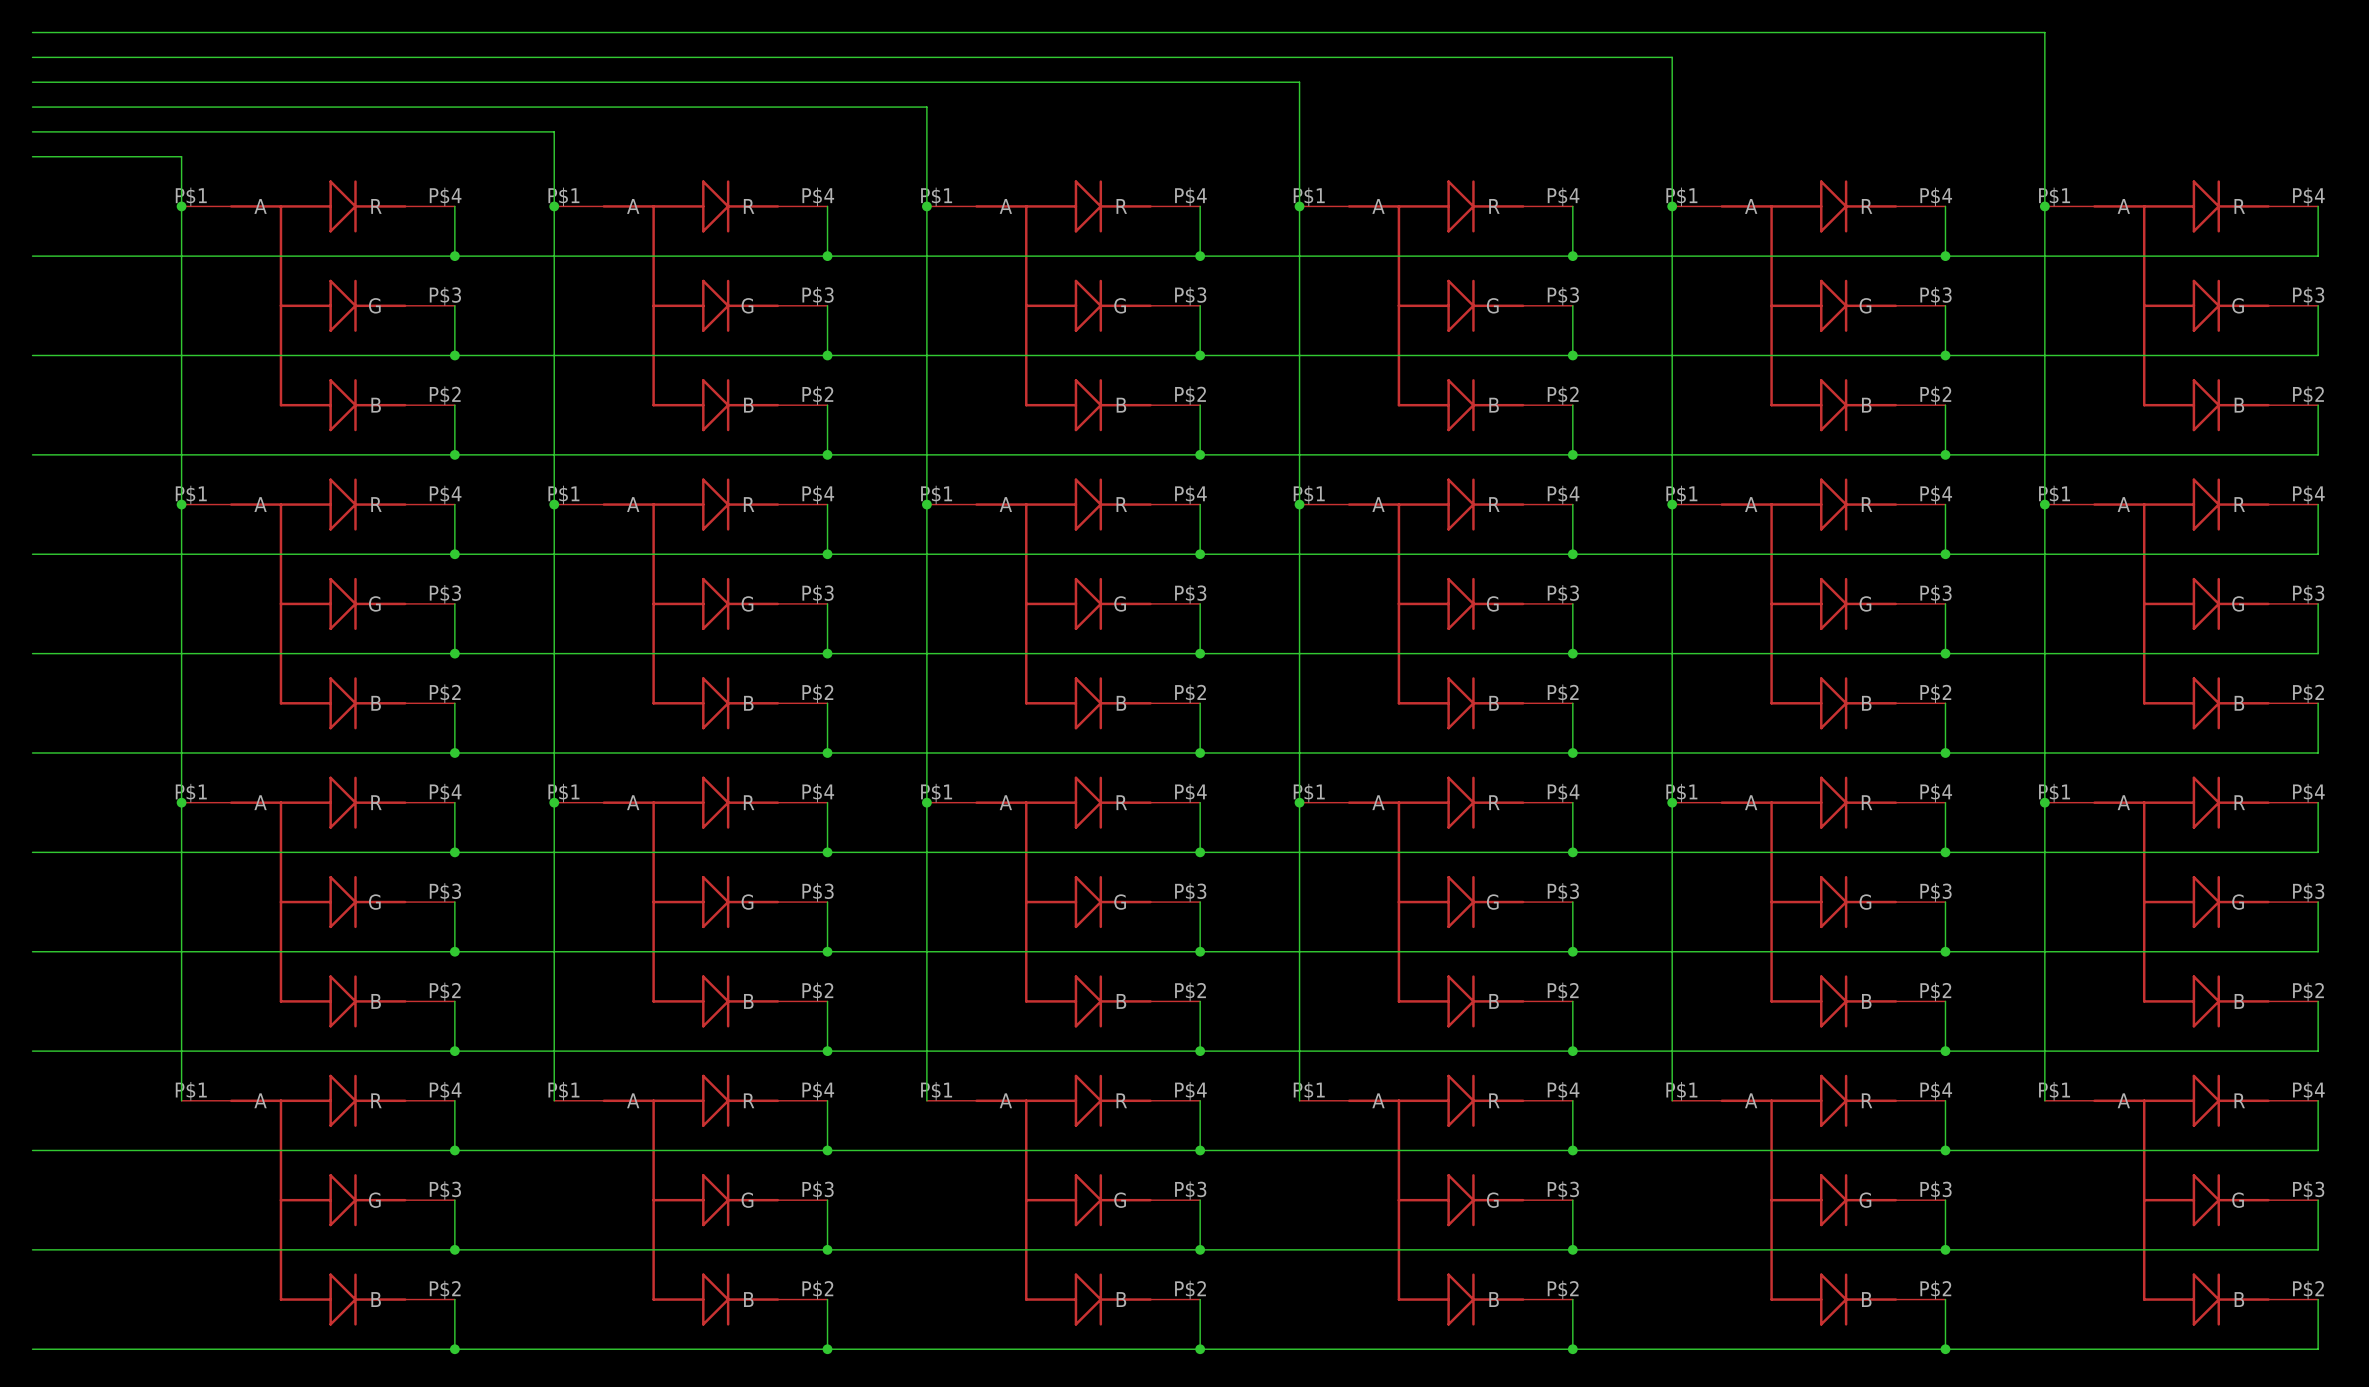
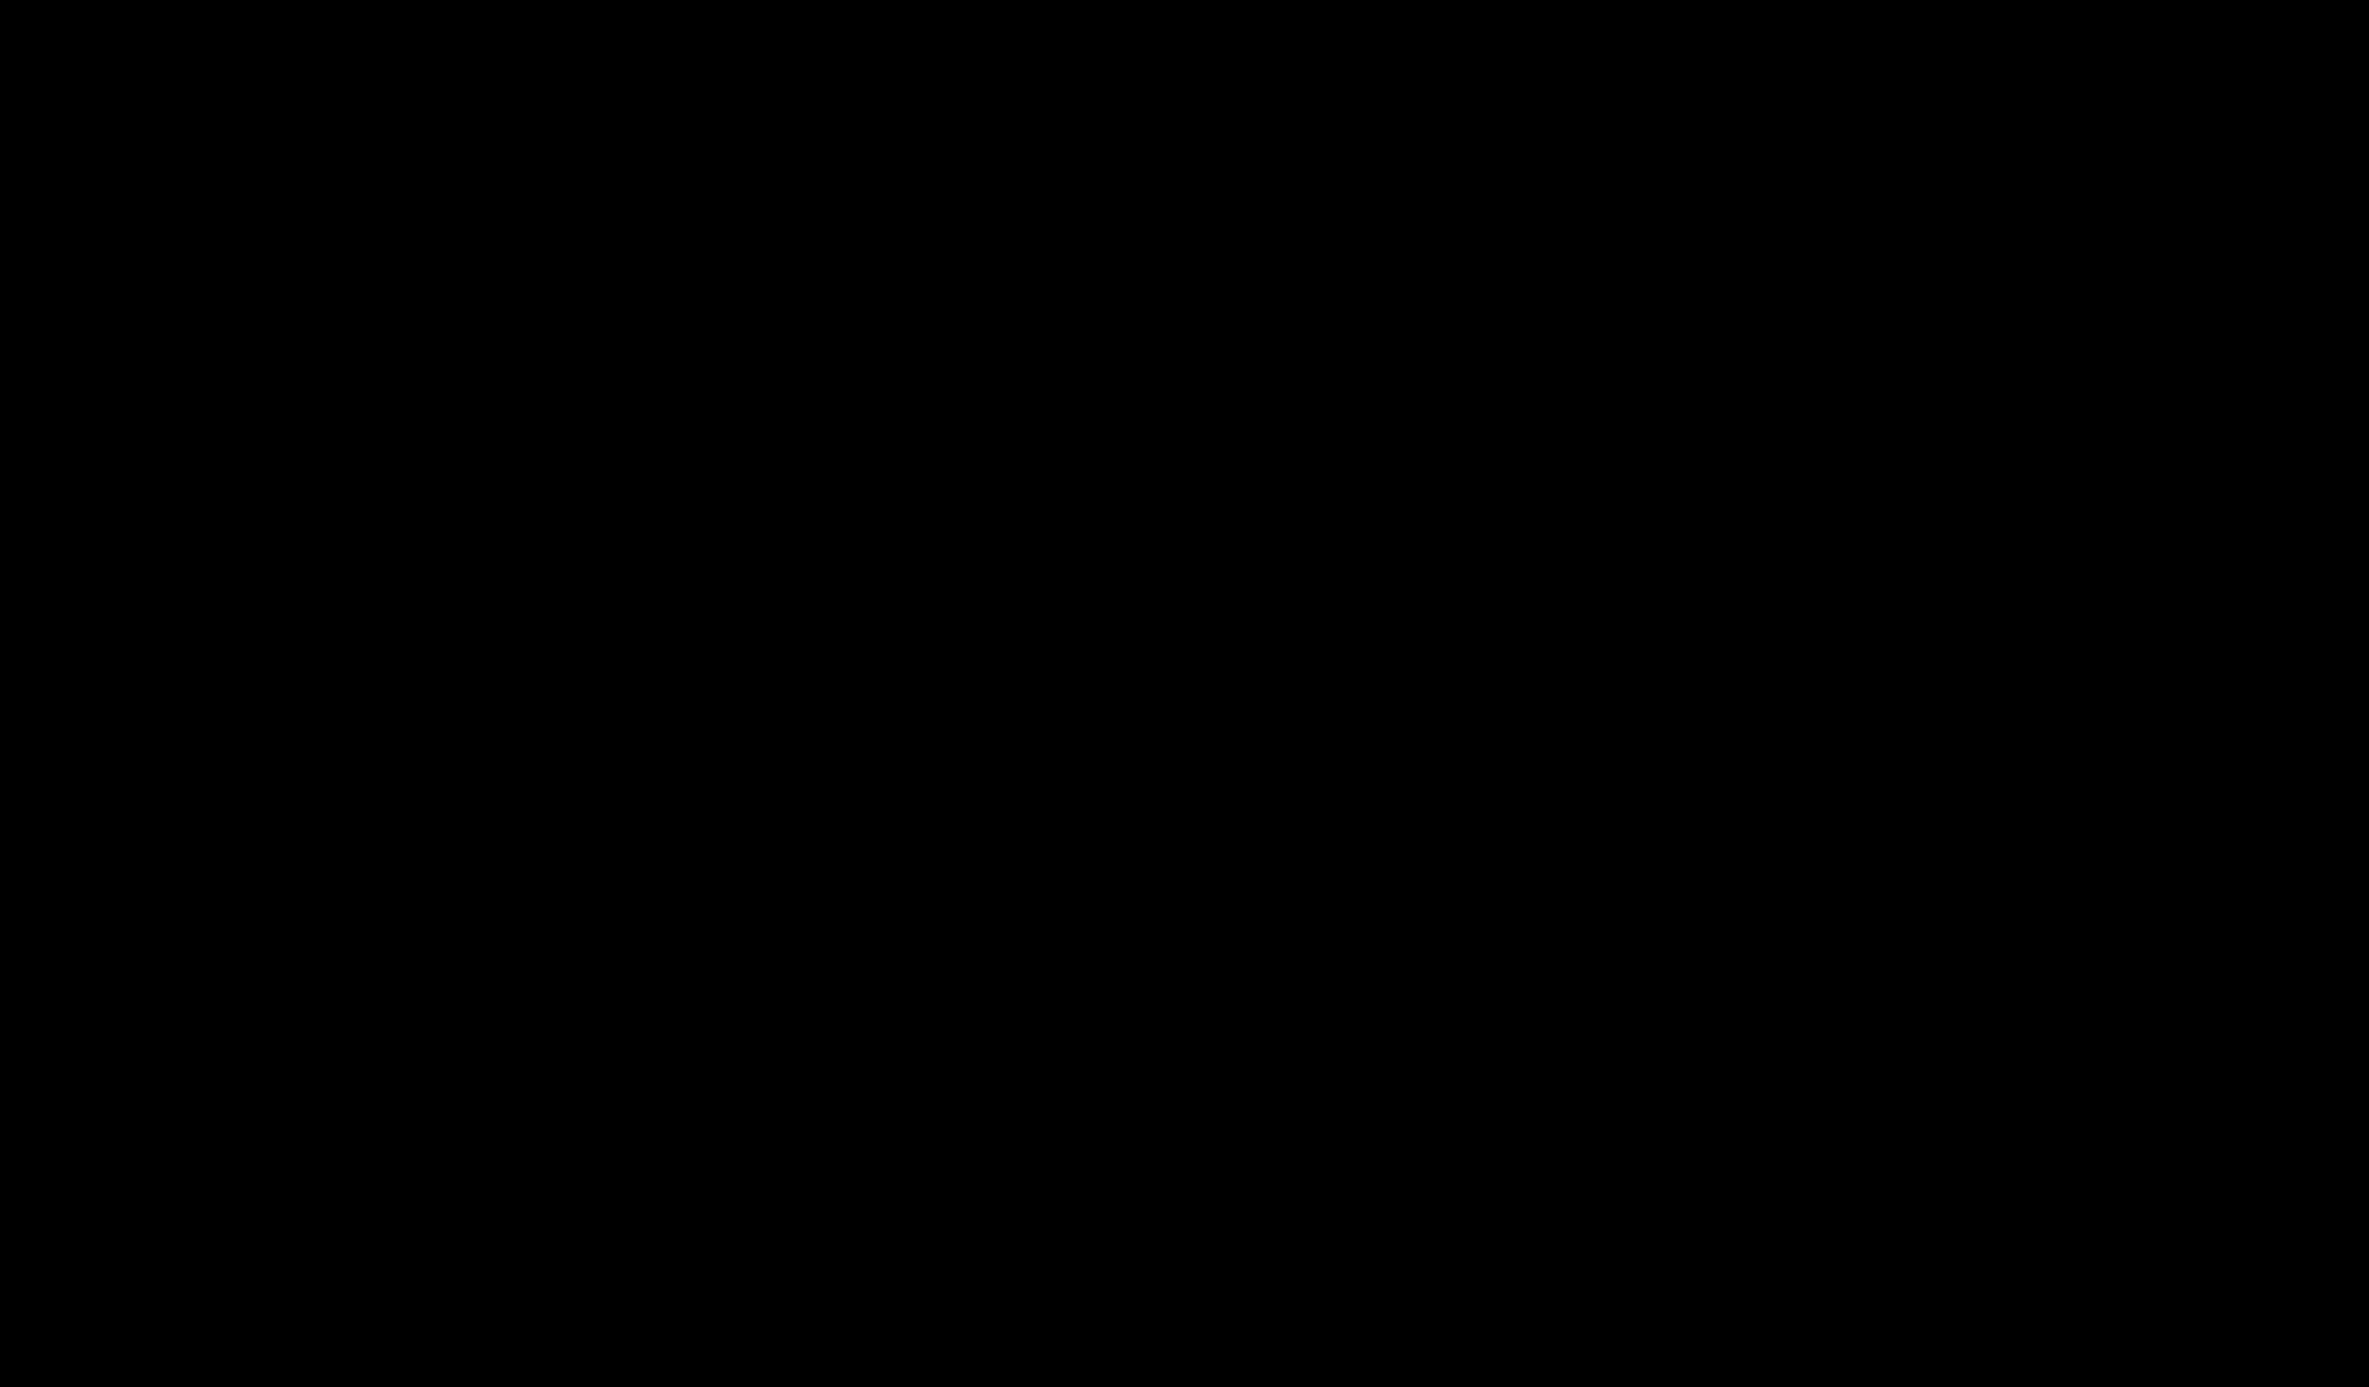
wire: (32, 32) (2044, 32) (2044, 1100) -> none
wire: (32, 57) (1672, 57) (1672, 1100) -> none
wire: (32, 82) (1299, 82) (1299, 1100) -> none
wire: (32, 107) (926, 107) (926, 1100) -> none
wire: (32, 131) (554, 131) (554, 1100) -> none
wire: (32, 156) (181, 156) (181, 1100) -> none
junction: (181, 206) -> none
wire: (454, 206) (454, 256) -> none
junction: (554, 206) -> none
wire: (827, 206) (827, 256) -> none
junction: (926, 206) -> none
wire: (1200, 206) (1200, 256) -> none
junction: (1299, 206) -> none
wire: (1572, 206) (1572, 256) -> none
junction: (1672, 206) -> none
wire: (1945, 206) (1945, 256) -> none
junction: (2044, 206) -> none
wire: (2318, 206) (2318, 256) (32, 256) -> none
junction: (454, 256) -> none
junction: (827, 256) -> none
junction: (1200, 256) -> none
junction: (1572, 256) -> none
junction: (1945, 256) -> none
part: (318, 305) -> none
wire: (454, 305) (454, 355) -> none
part: (690, 305) -> none
wire: (827, 305) (827, 355) -> none
part: (1063, 305) -> none
wire: (1200, 305) (1200, 355) -> none
part: (1436, 305) -> none
wire: (1572, 305) (1572, 355) -> none
part: (1808, 305) -> none
wire: (1945, 305) (1945, 355) -> none
part: (2181, 305) -> none
wire: (2318, 305) (2318, 355) (32, 355) -> none
junction: (454, 355) -> none
junction: (827, 355) -> none
junction: (1200, 355) -> none
junction: (1572, 355) -> none
junction: (1945, 355) -> none
wire: (454, 405) (454, 454) -> none
wire: (827, 405) (827, 454) -> none
wire: (1200, 405) (1200, 454) -> none
wire: (1572, 405) (1572, 454) -> none
wire: (1945, 405) (1945, 454) -> none
wire: (2318, 405) (2318, 454) (32, 454) -> none
junction: (454, 454) -> none
junction: (827, 454) -> none
junction: (1200, 454) -> none
junction: (1572, 454) -> none
junction: (1945, 454) -> none
junction: (181, 504) -> none
wire: (454, 504) (454, 554) -> none
junction: (554, 504) -> none
wire: (827, 504) (827, 554) -> none
junction: (926, 504) -> none
wire: (1200, 504) (1200, 554) -> none
junction: (1299, 504) -> none
wire: (1572, 504) (1572, 554) -> none
junction: (1672, 504) -> none
wire: (1945, 504) (1945, 554) -> none
junction: (2044, 504) -> none
wire: (2318, 504) (2318, 554) (32, 554) -> none
junction: (454, 554) -> none
junction: (827, 554) -> none
junction: (1200, 554) -> none
junction: (1572, 554) -> none
junction: (1945, 554) -> none
part: (318, 603) -> none
wire: (454, 603) (454, 653) -> none
part: (690, 603) -> none
wire: (827, 603) (827, 653) -> none
part: (1063, 603) -> none
wire: (1200, 603) (1200, 653) -> none
part: (1436, 603) -> none
wire: (1572, 603) (1572, 653) -> none
part: (1808, 603) -> none
wire: (1945, 603) (1945, 653) -> none
part: (2181, 603) -> none
wire: (2318, 603) (2318, 653) (32, 653) -> none
junction: (454, 653) -> none
junction: (827, 653) -> none
junction: (1200, 653) -> none
junction: (1572, 653) -> none
junction: (1945, 653) -> none
wire: (454, 703) (454, 752) -> none
wire: (827, 703) (827, 752) -> none
wire: (1200, 703) (1200, 752) -> none
wire: (1572, 703) (1572, 752) -> none
wire: (1945, 703) (1945, 752) -> none
wire: (2318, 703) (2318, 752) (32, 752) -> none
junction: (454, 752) -> none
junction: (827, 752) -> none
junction: (1200, 752) -> none
junction: (1572, 752) -> none
junction: (1945, 752) -> none
junction: (181, 802) -> none
wire: (454, 802) (454, 852) -> none
junction: (554, 802) -> none
wire: (827, 802) (827, 852) -> none
junction: (926, 802) -> none
wire: (1200, 802) (1200, 852) -> none
junction: (1299, 802) -> none
wire: (1572, 802) (1572, 852) -> none
junction: (1672, 802) -> none
wire: (1945, 802) (1945, 852) -> none
junction: (2044, 802) -> none
wire: (2318, 802) (2318, 852) (32, 852) -> none
junction: (454, 852) -> none
junction: (827, 852) -> none
junction: (1200, 852) -> none
junction: (1572, 852) -> none
junction: (1945, 852) -> none
part: (318, 902) -> none
wire: (454, 902) (454, 951) -> none
part: (690, 902) -> none
wire: (827, 902) (827, 951) -> none
part: (1063, 902) -> none
wire: (1200, 902) (1200, 951) -> none
part: (1436, 902) -> none
wire: (1572, 902) (1572, 951) -> none
part: (1808, 902) -> none
wire: (1945, 902) (1945, 951) -> none
part: (2181, 902) -> none
wire: (2318, 902) (2318, 951) (32, 951) -> none
junction: (454, 951) -> none
junction: (827, 951) -> none
junction: (1200, 951) -> none
junction: (1572, 951) -> none
junction: (1945, 951) -> none
wire: (454, 1001) (454, 1051) -> none
wire: (827, 1001) (827, 1051) -> none
wire: (1200, 1001) (1200, 1051) -> none
wire: (1572, 1001) (1572, 1051) -> none
wire: (1945, 1001) (1945, 1051) -> none
wire: (2318, 1001) (2318, 1051) (32, 1051) -> none
junction: (454, 1051) -> none
junction: (827, 1051) -> none
junction: (1200, 1051) -> none
junction: (1572, 1051) -> none
junction: (1945, 1051) -> none
wire: (454, 1100) (454, 1150) -> none
wire: (827, 1100) (827, 1150) -> none
wire: (1200, 1100) (1200, 1150) -> none
wire: (1572, 1100) (1572, 1150) -> none
wire: (1945, 1100) (1945, 1150) -> none
wire: (2318, 1100) (2318, 1150) (32, 1150) -> none
junction: (454, 1150) -> none
junction: (827, 1150) -> none
junction: (1200, 1150) -> none
junction: (1572, 1150) -> none
junction: (1945, 1150) -> none
part: (318, 1200) -> none
wire: (454, 1200) (454, 1249) -> none
part: (690, 1200) -> none
wire: (827, 1200) (827, 1249) -> none
part: (1063, 1200) -> none
wire: (1200, 1200) (1200, 1249) -> none
part: (1436, 1200) -> none
wire: (1572, 1200) (1572, 1249) -> none
part: (1808, 1200) -> none
wire: (1945, 1200) (1945, 1249) -> none
part: (2181, 1200) -> none
wire: (2318, 1200) (2318, 1249) (32, 1249) -> none
junction: (454, 1249) -> none
junction: (827, 1249) -> none
junction: (1200, 1249) -> none
junction: (1572, 1249) -> none
junction: (1945, 1249) -> none
wire: (454, 1299) (454, 1349) -> none
wire: (827, 1299) (827, 1349) -> none
wire: (1200, 1299) (1200, 1349) -> none
wire: (1572, 1299) (1572, 1349) -> none
wire: (1945, 1299) (1945, 1349) -> none
wire: (2318, 1299) (2318, 1349) (32, 1349) -> none
junction: (454, 1349) -> none
junction: (827, 1349) -> none
junction: (1200, 1349) -> none
junction: (1572, 1349) -> none
junction: (1945, 1349) -> none

